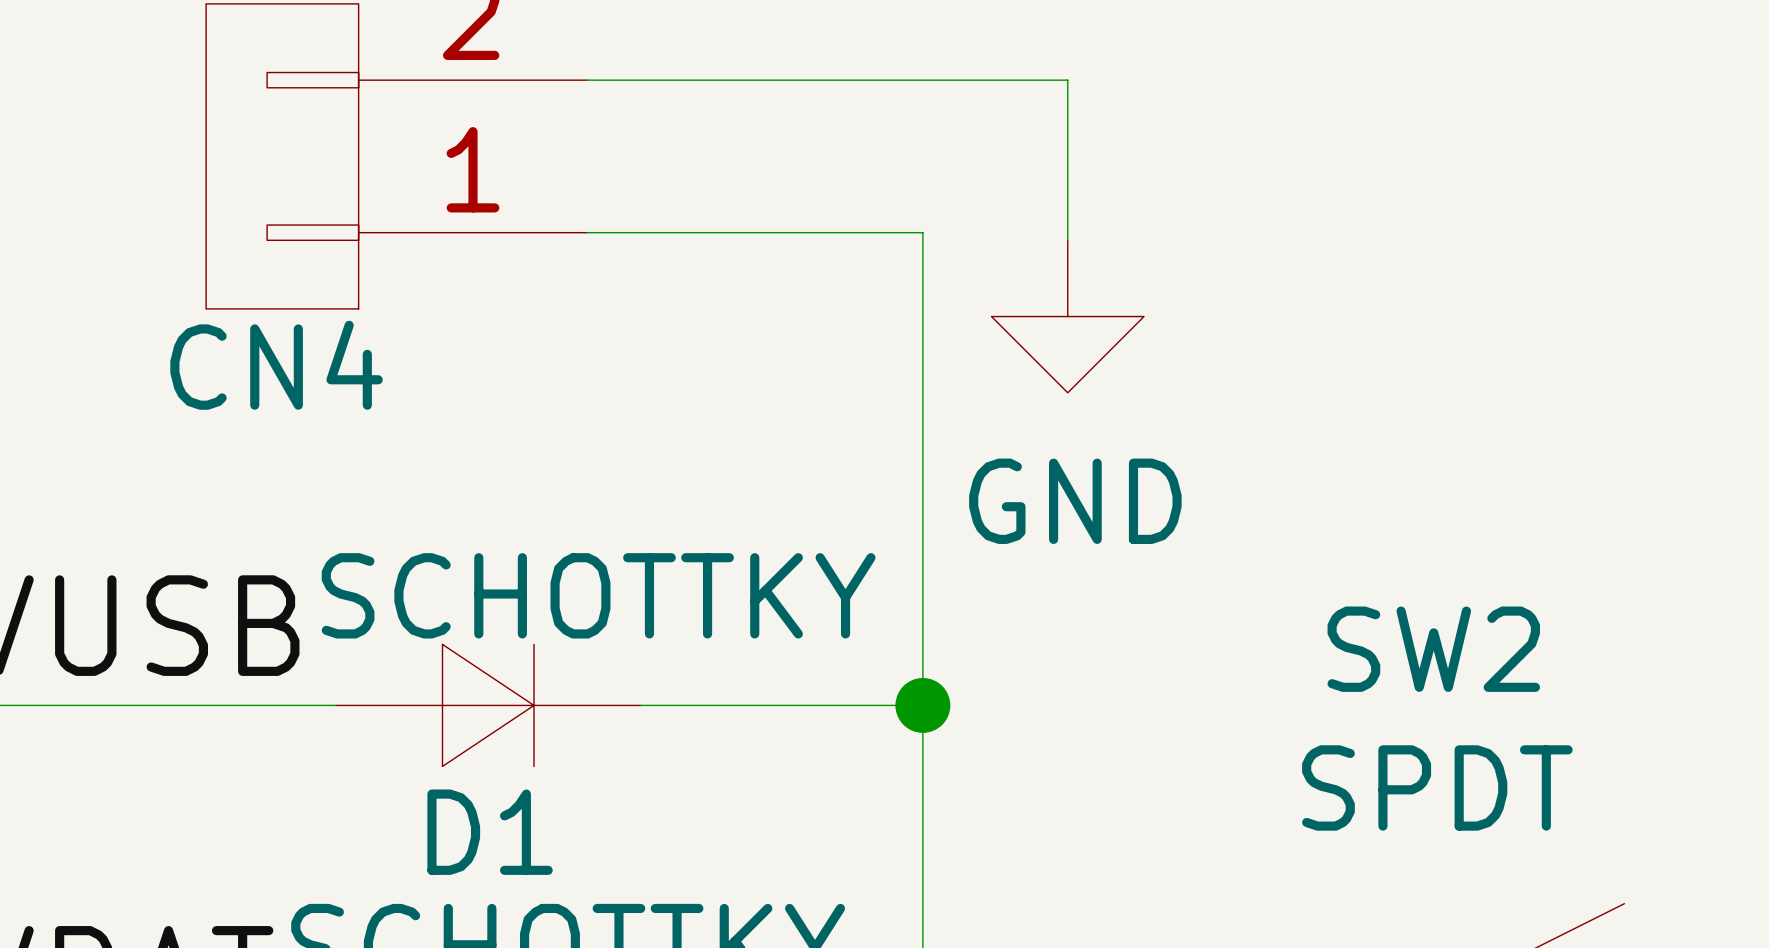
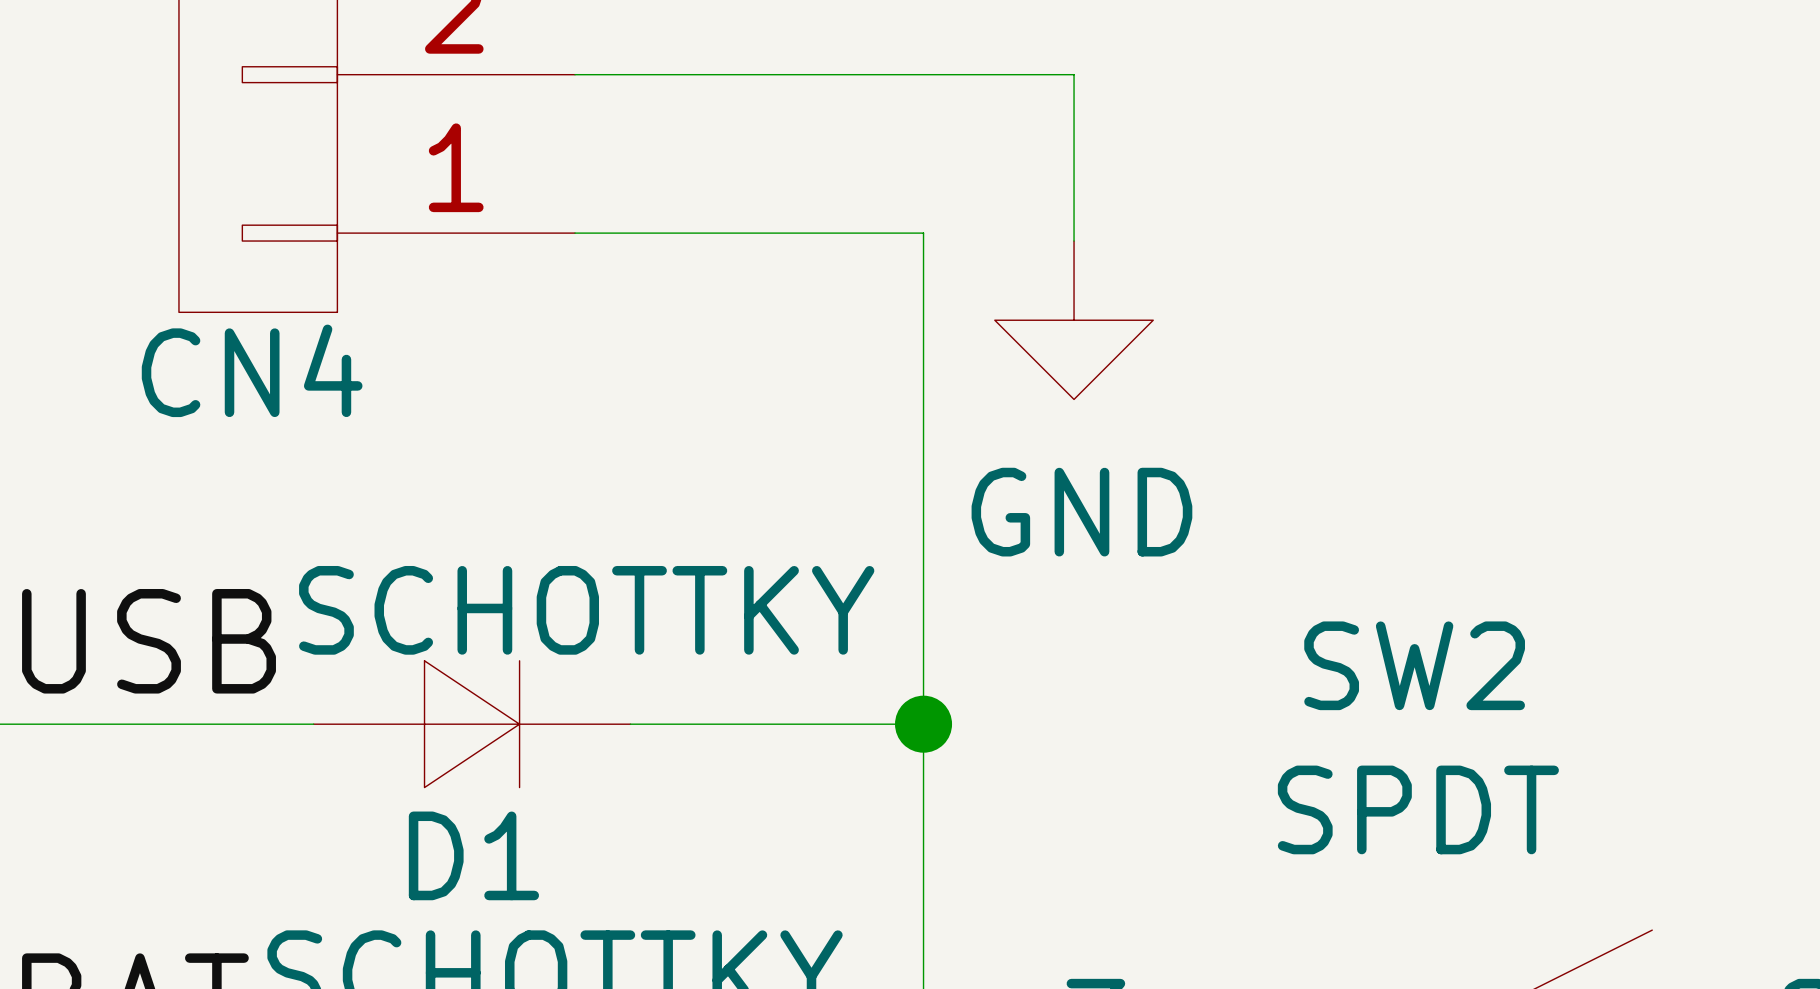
SW2 name position: SW2 (1433, 649) -> SW2 (1414, 665)
SW2 value position: SPDT (1437, 787) -> SPDT (1418, 809)

